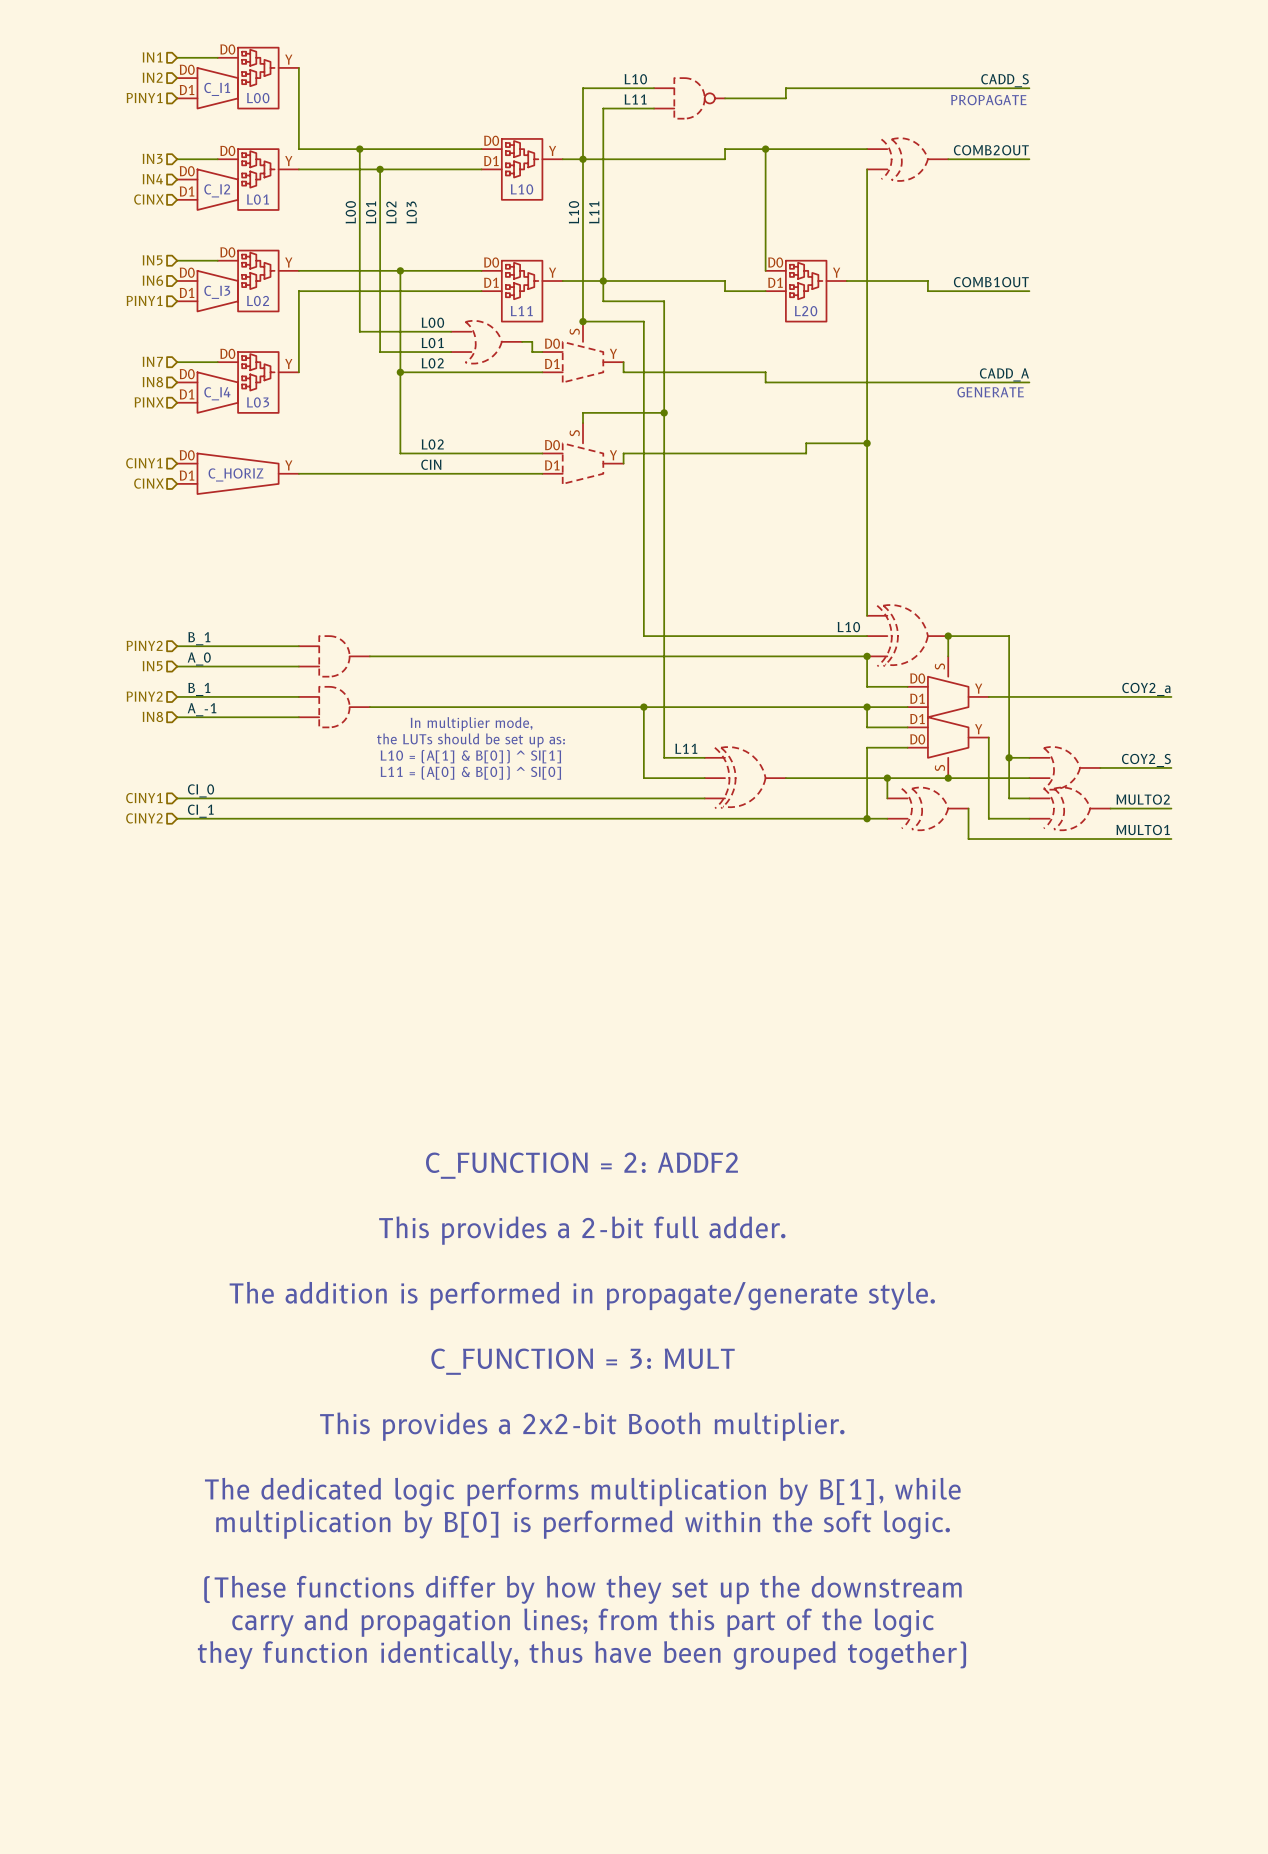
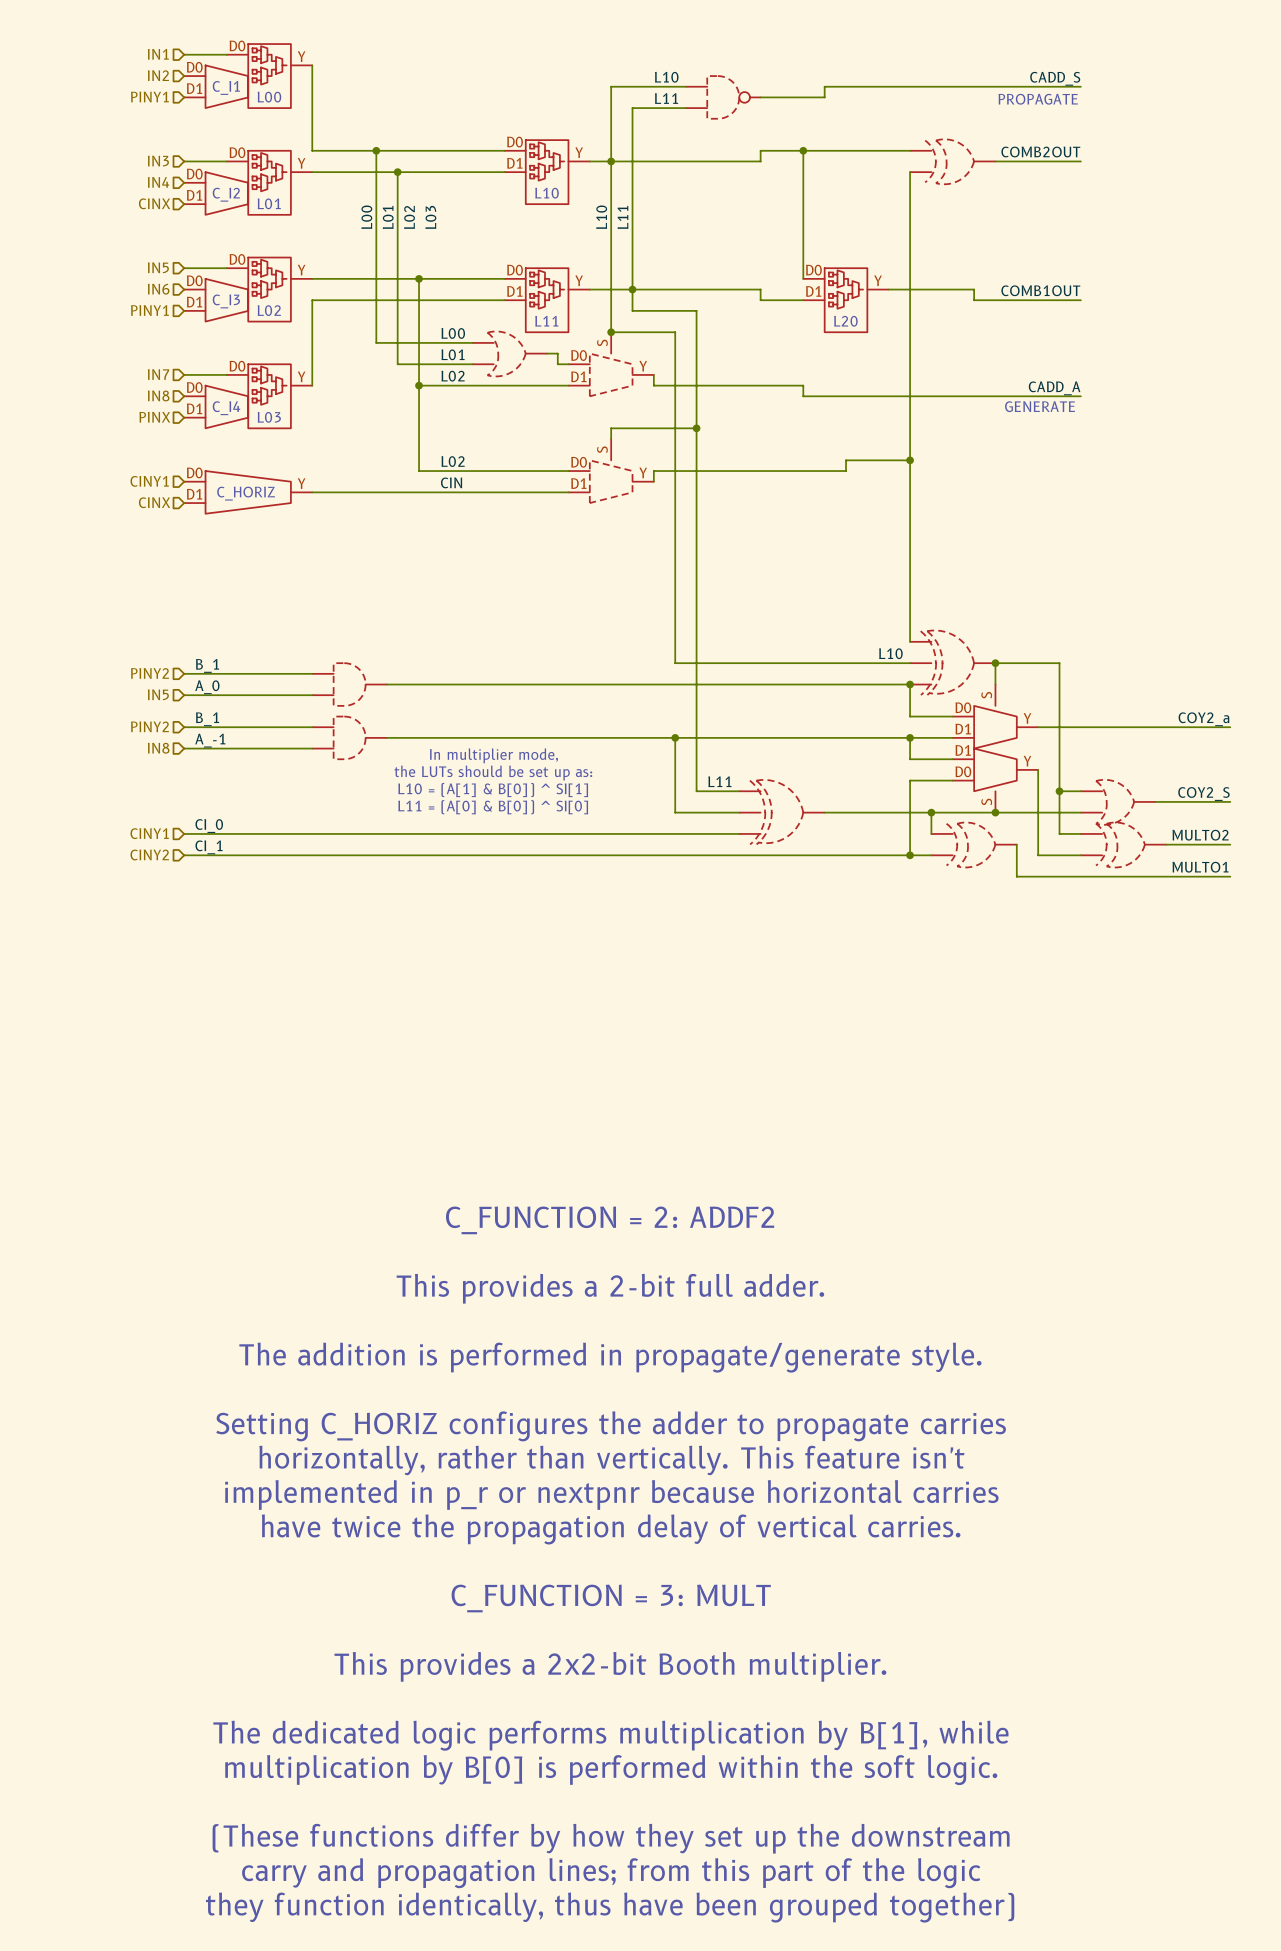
text: C_FUNCTION = 3: MULT (583, 1361) -> Setting C_HORIZ configures the adder to propagate carries (611, 1426)
text: none -> horizontally, rather than vertically. This feature isn't (611, 1460)
text: This provides a 2x2-bit Booth multiplier. (582, 1426) -> implemented in p_r or nextpnr because horizontal carries (611, 1494)
text: none -> have twice the propagation delay of vertical carries. (611, 1529)
text: The dedicated logic performs multiplication by B[1], while (582, 1492) -> none
text: multiplication by B[0] is performed within the soft logic. (583, 1524) -> C_FUNCTION = 3: MULT (611, 1598)
text: (These functions differ by how they set up the downstream (582, 1589) -> This provides a 2x2-bit Booth multiplier. (610, 1666)
text position: carry and propagation lines; from this part of the logic (583, 1622) -> carry and propagation lines; from this part of the logic (611, 1873)
text: they function identically, thus have been grouped together) (581, 1655) -> The dedicated logic performs multiplication by B[1], while (610, 1735)
text: none -> multiplication by B[0] is performed within the soft logic. (611, 1770)
text: none -> (These functions differ by how they set up the downstream (611, 1838)
text: none -> they function identically, thus have been grouped together) (610, 1907)

